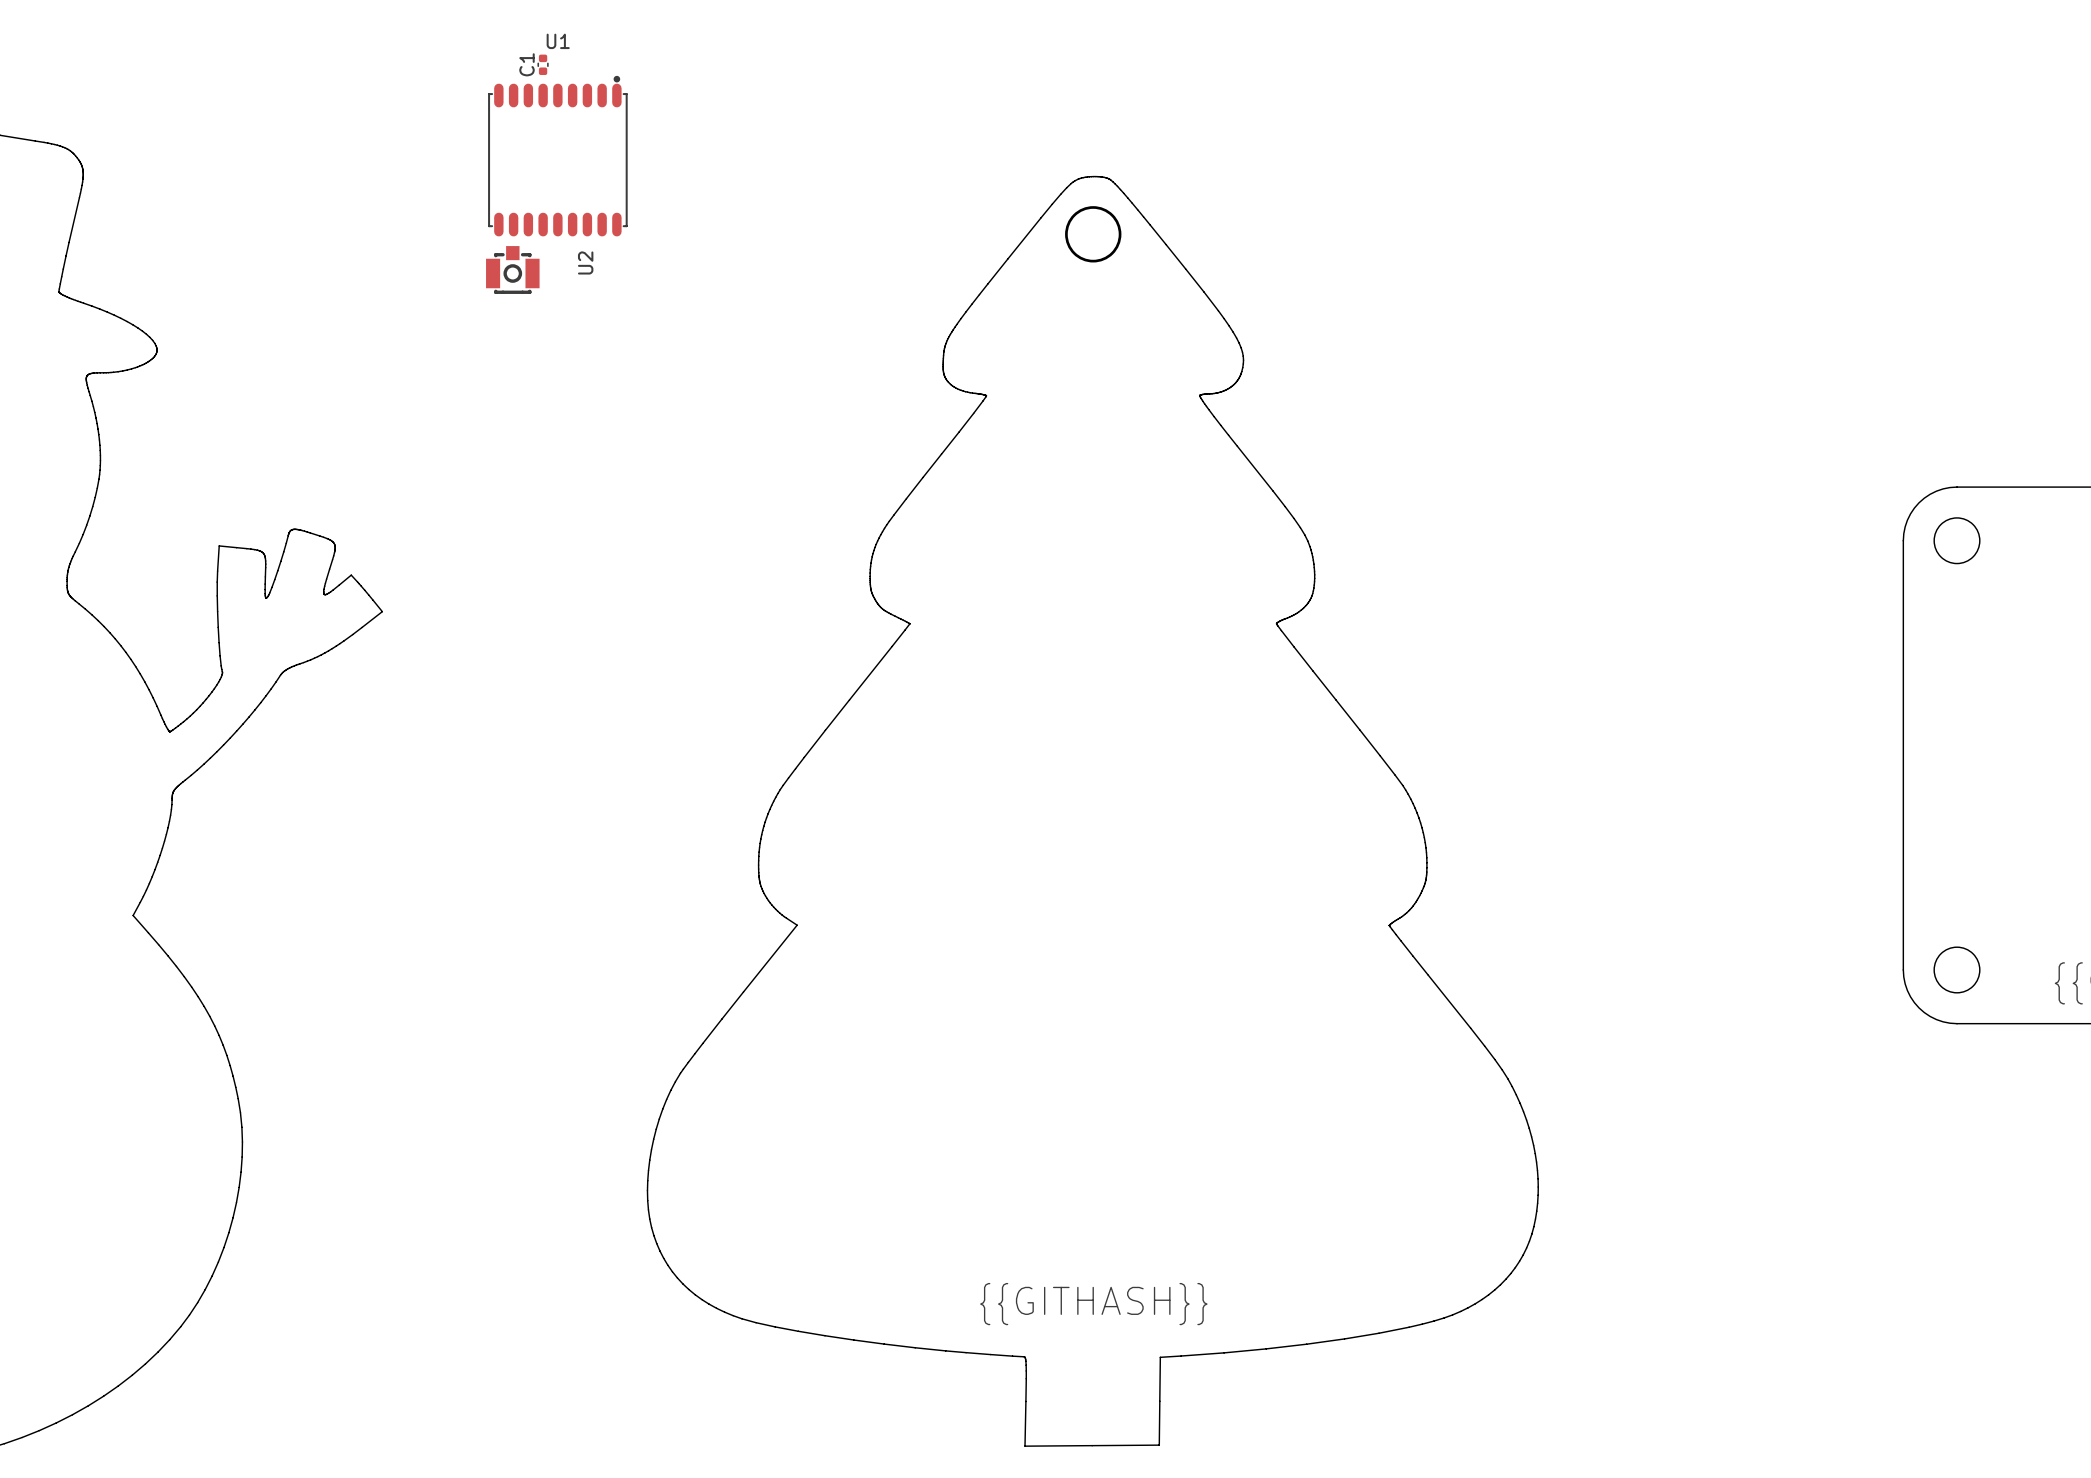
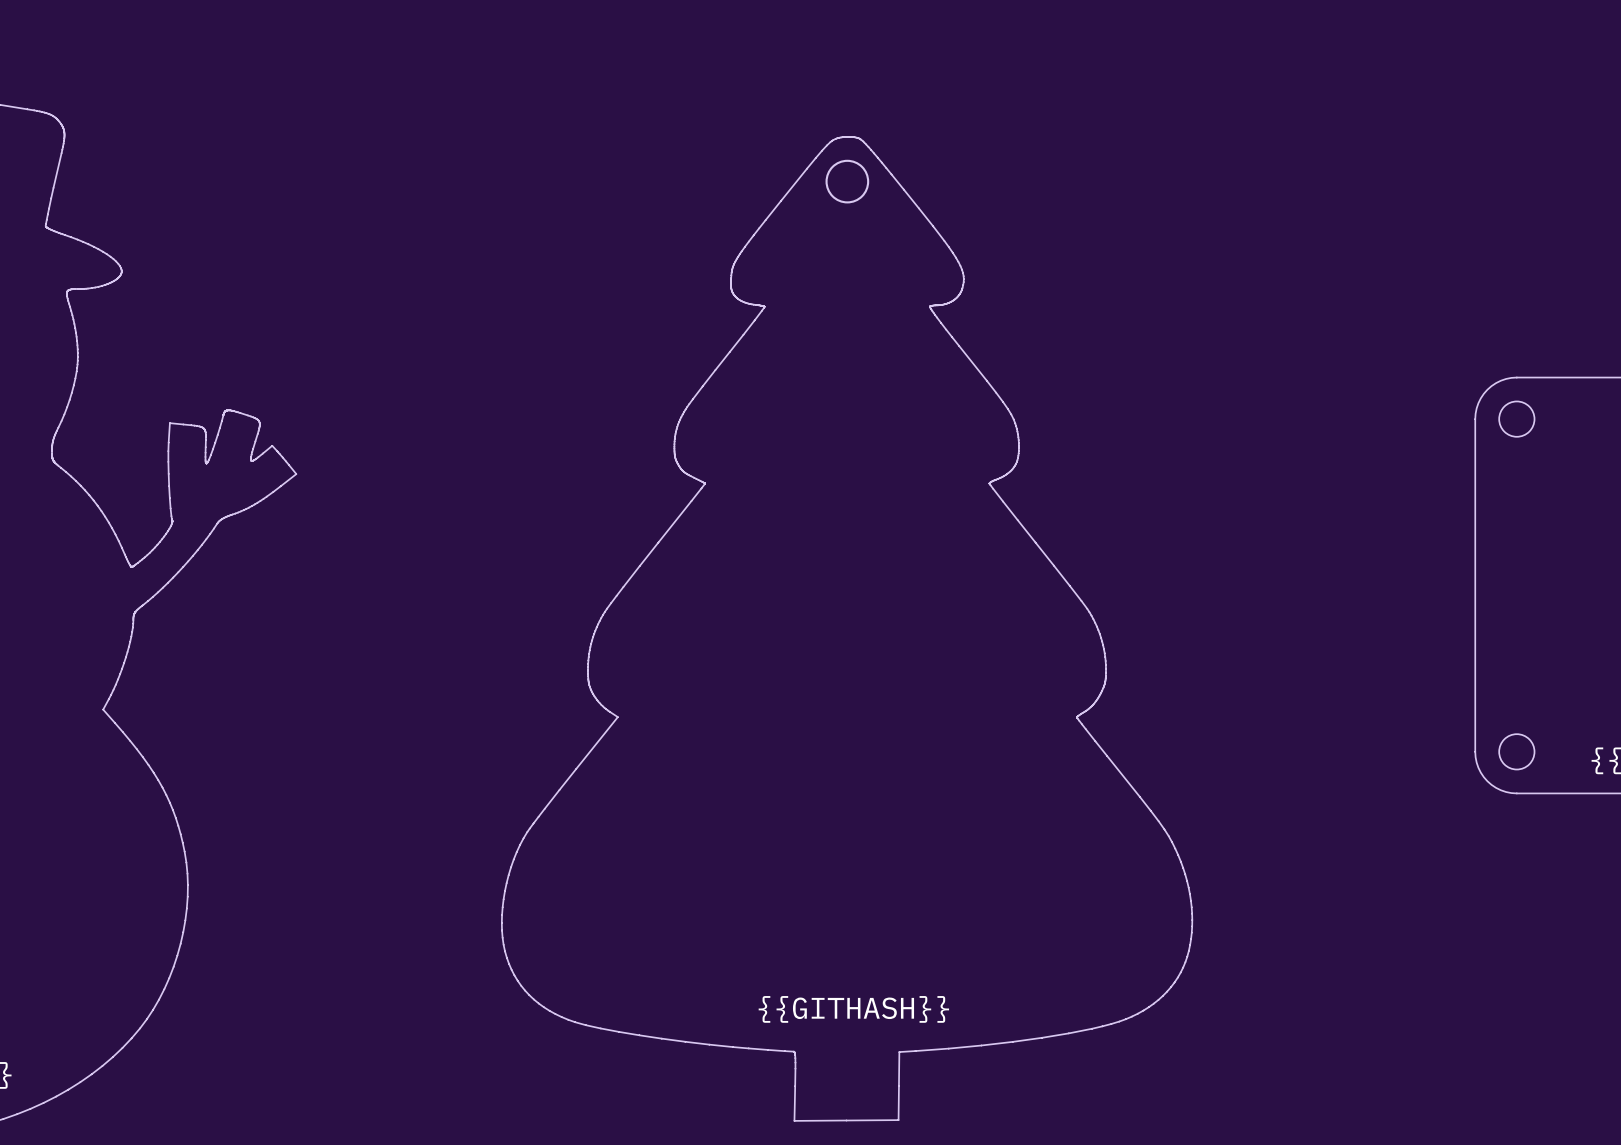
C1: (543, 64) -> none
U1: (557, 156) -> none
U2: (512, 270) -> none

